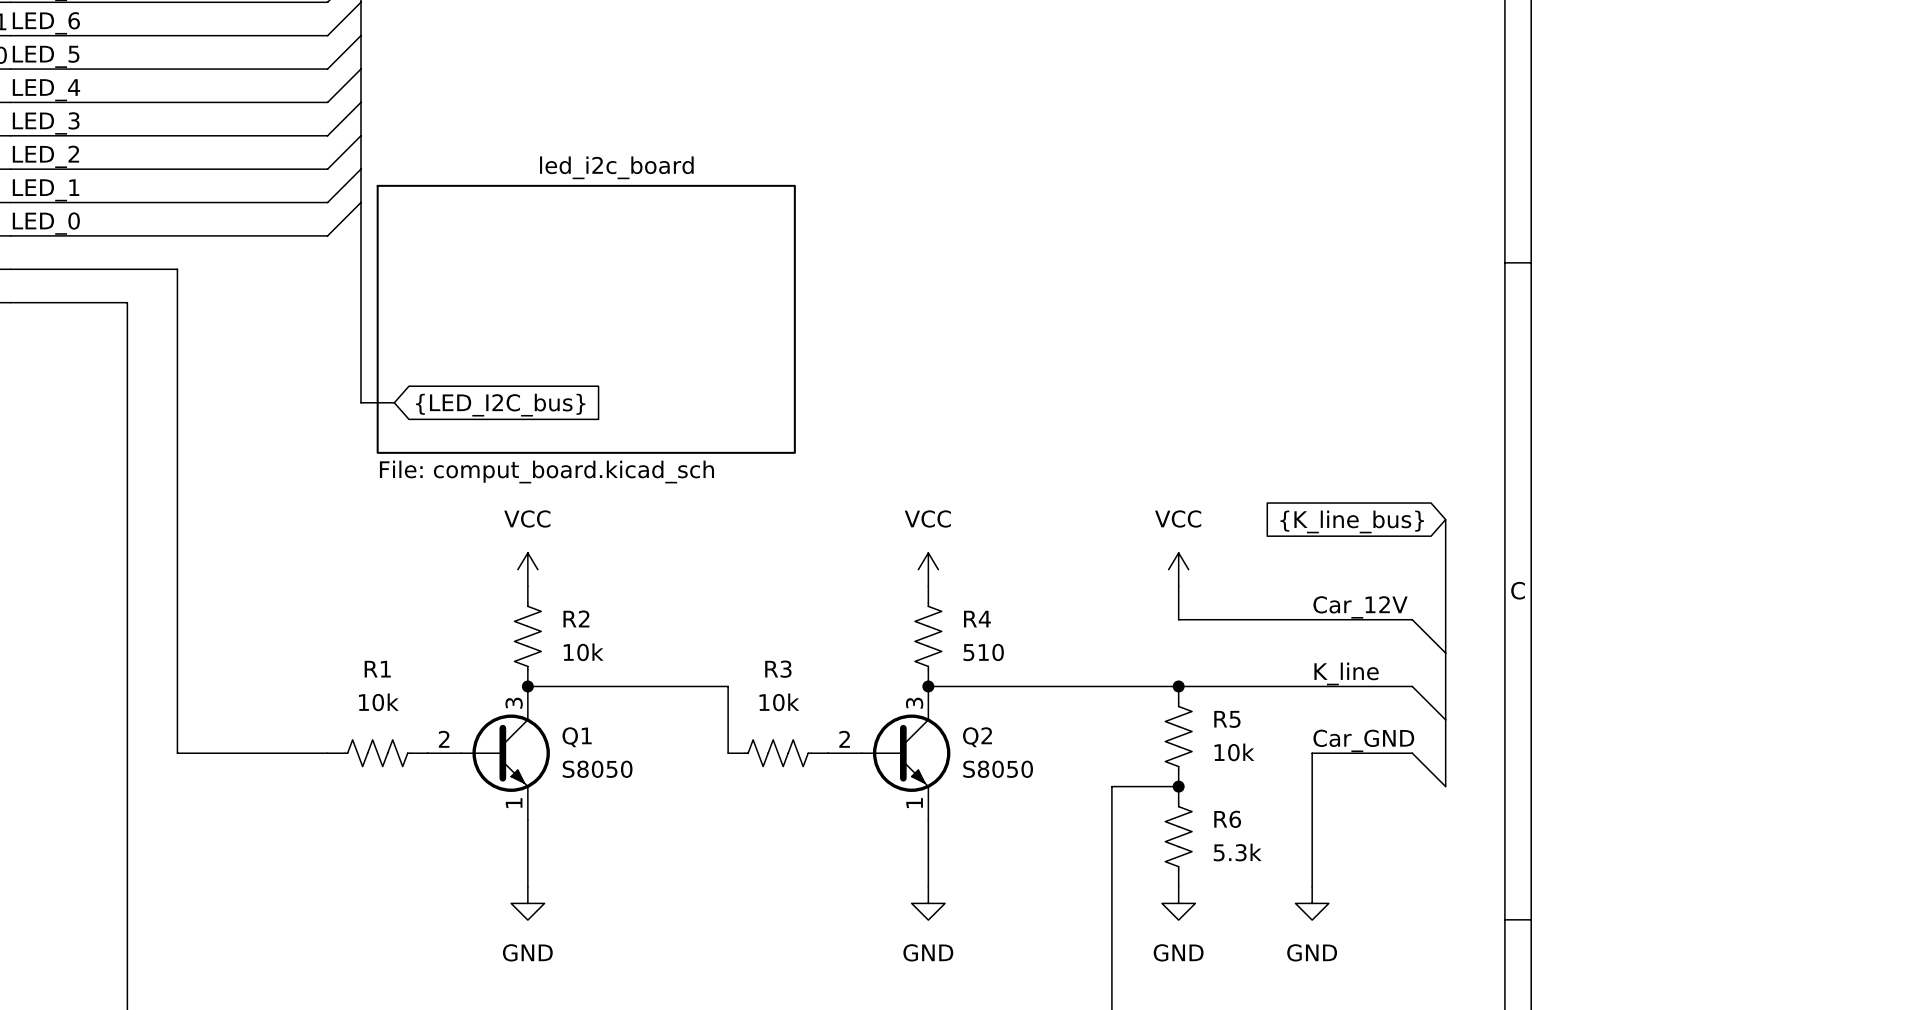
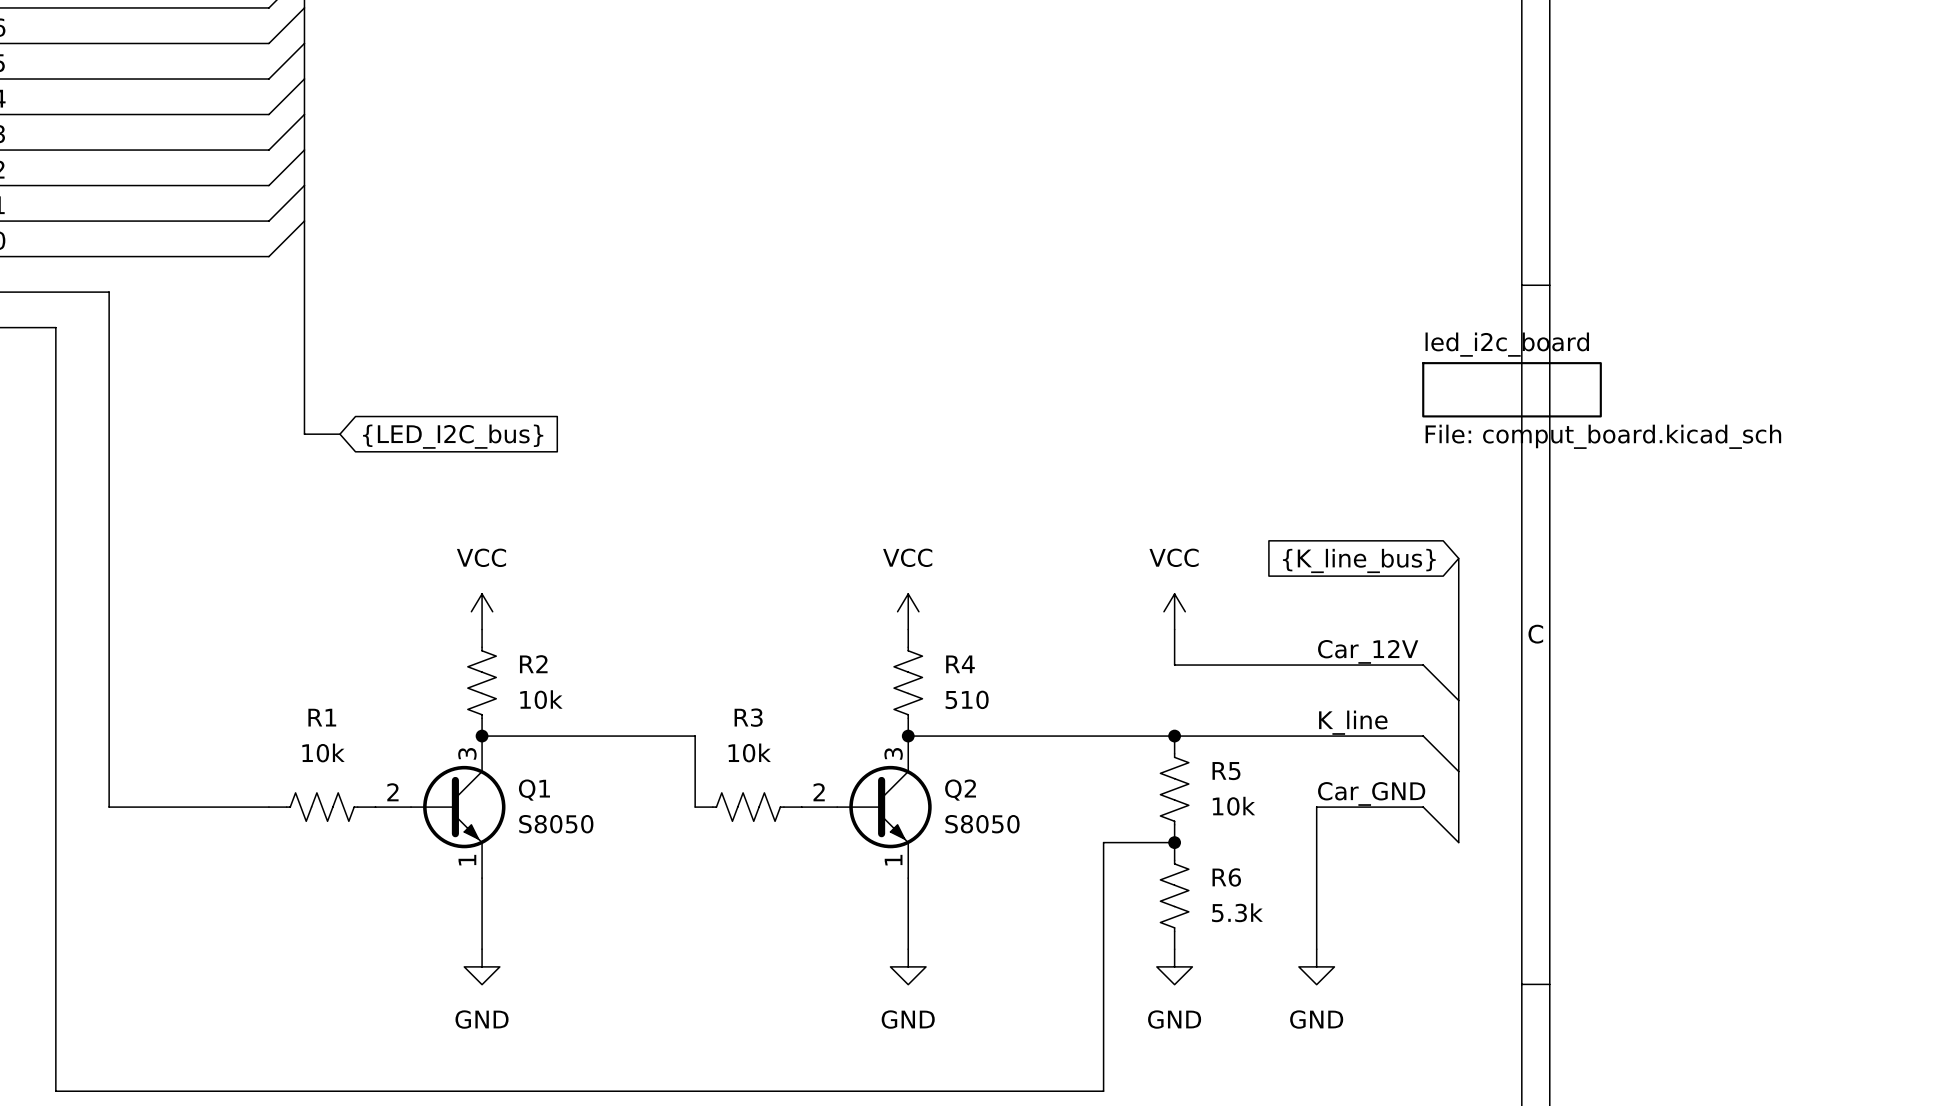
sheet led_i2c_board name position: led_i2c_board (616, 167) -> led_i2c_board (1507, 344)
sheet led_i2c_board shape: [376, 184, 796, 454] -> [1422, 362, 1602, 418]
sheet led_i2c_board value position: File: comput_board.kicad_sch (546, 472) -> File: comput_board.kicad_sch (1603, 436)

